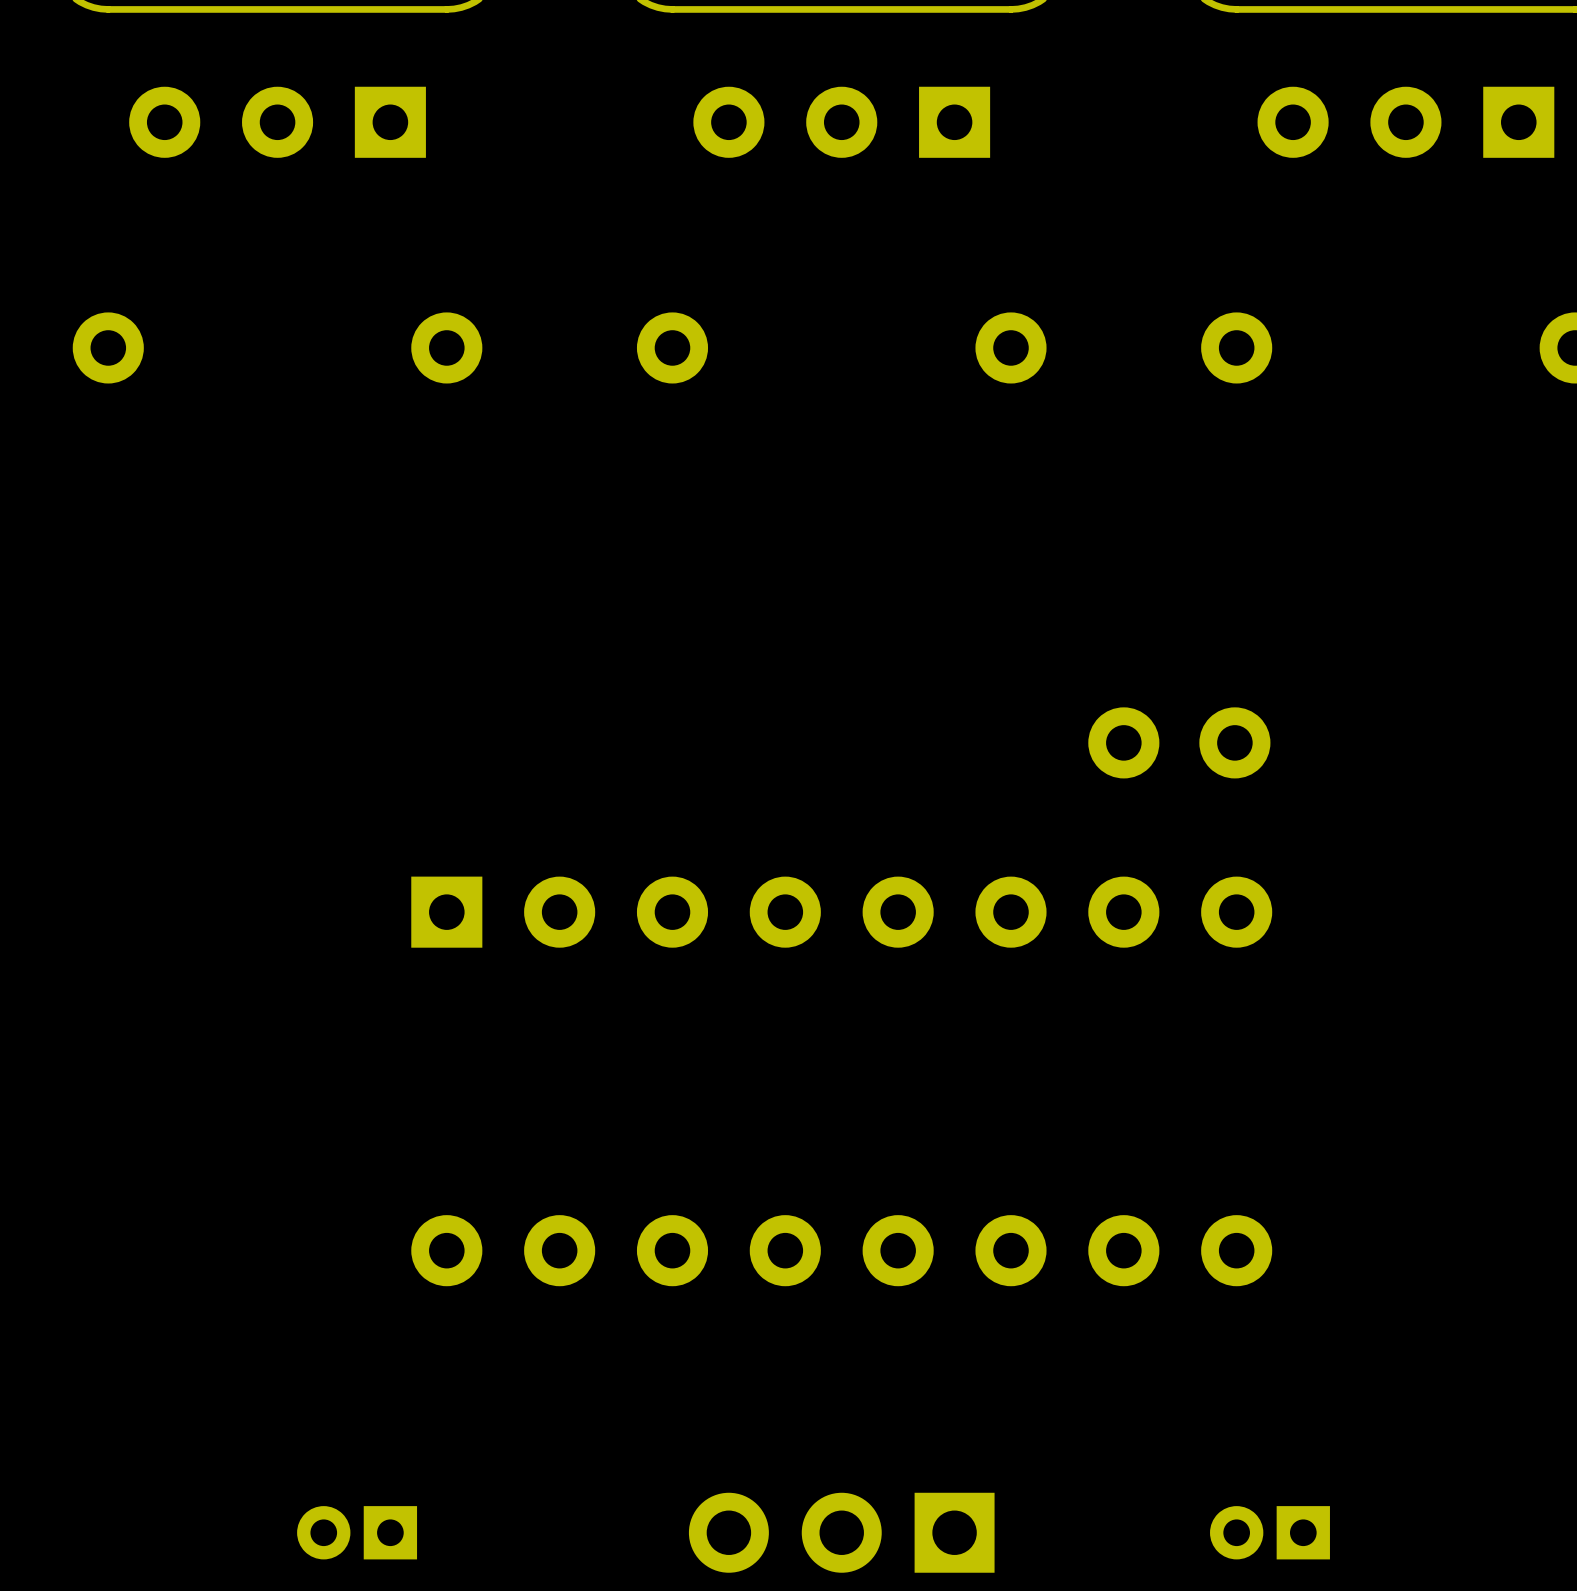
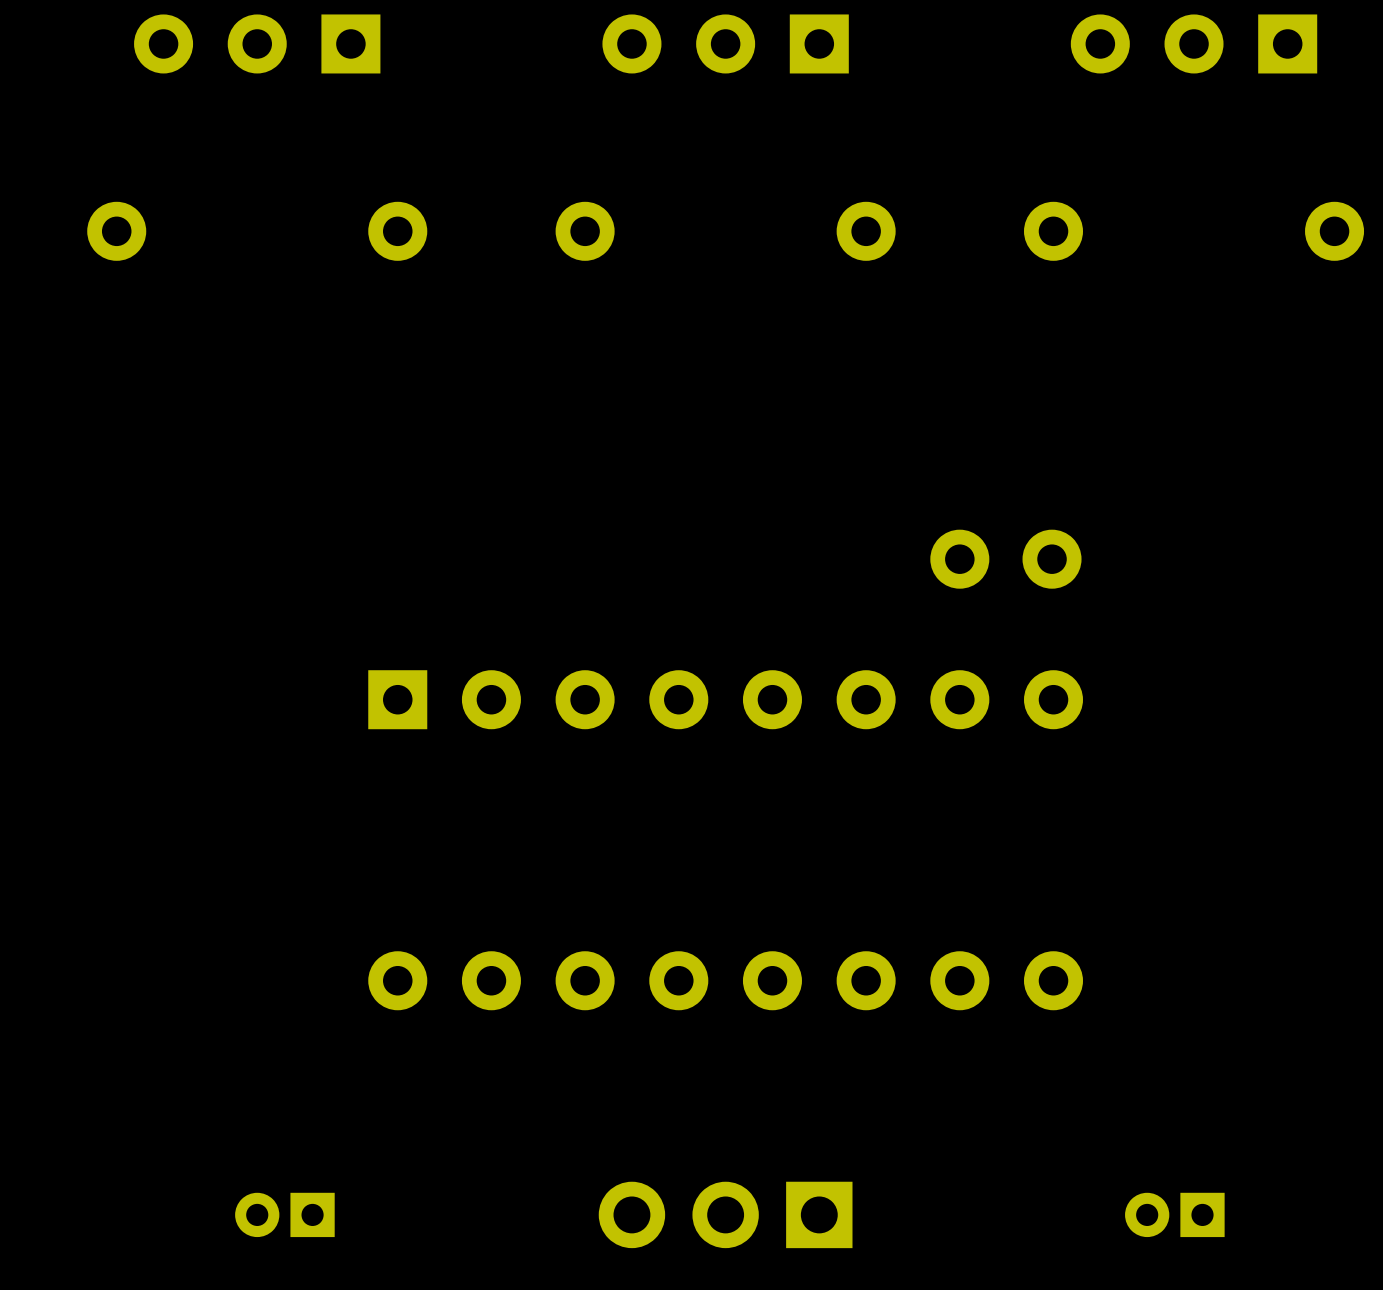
part position: (357, 1532) -> (284, 1214)
part position: (1269, 1532) -> (1174, 1214)

